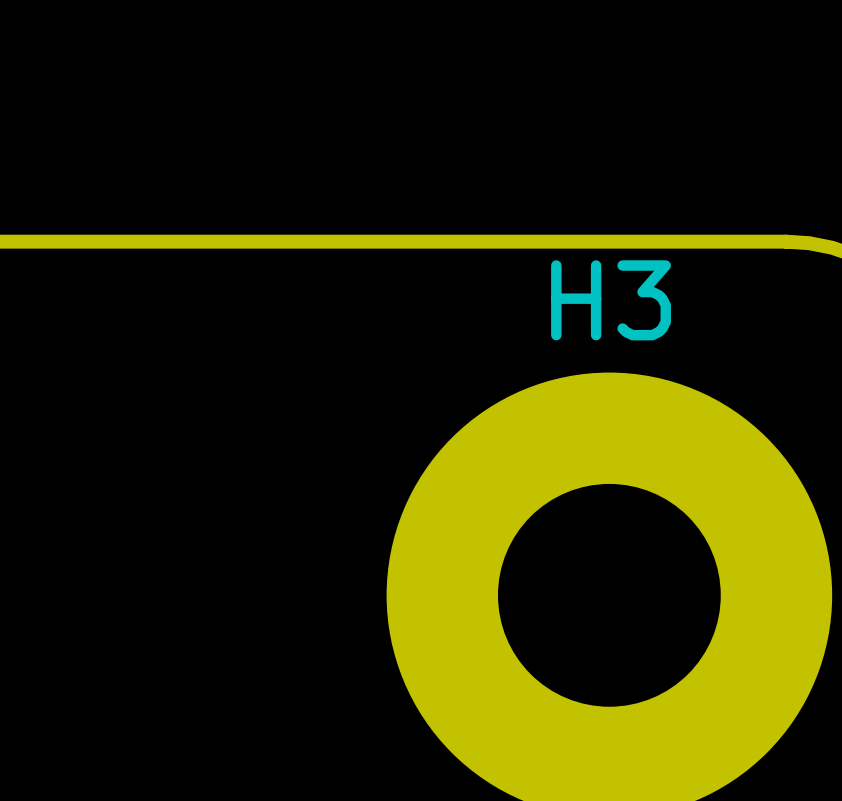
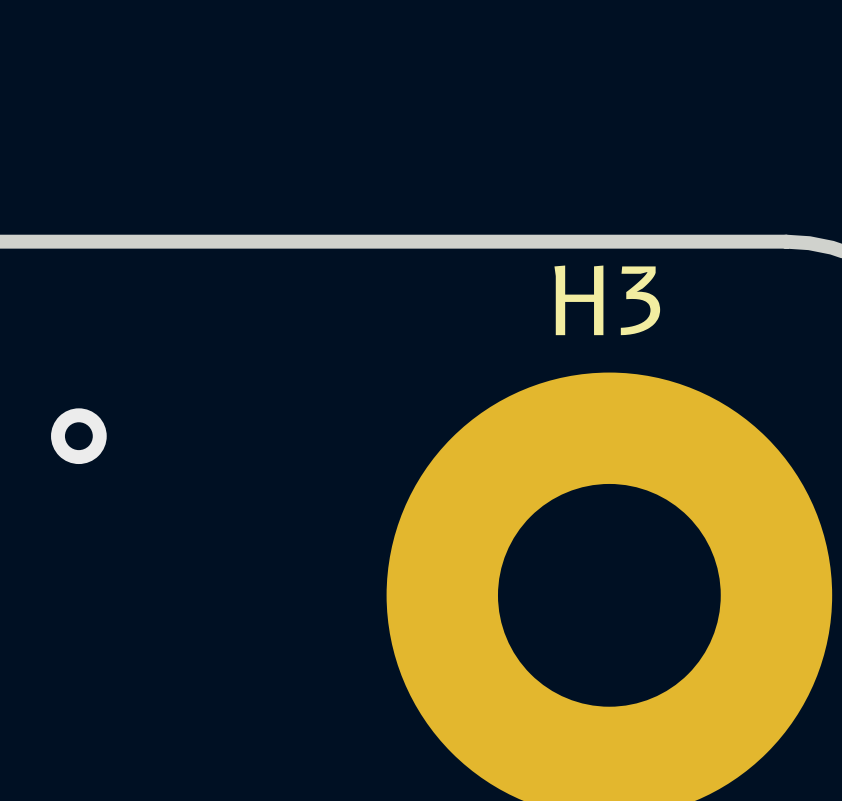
via: none -> (78, 436)

